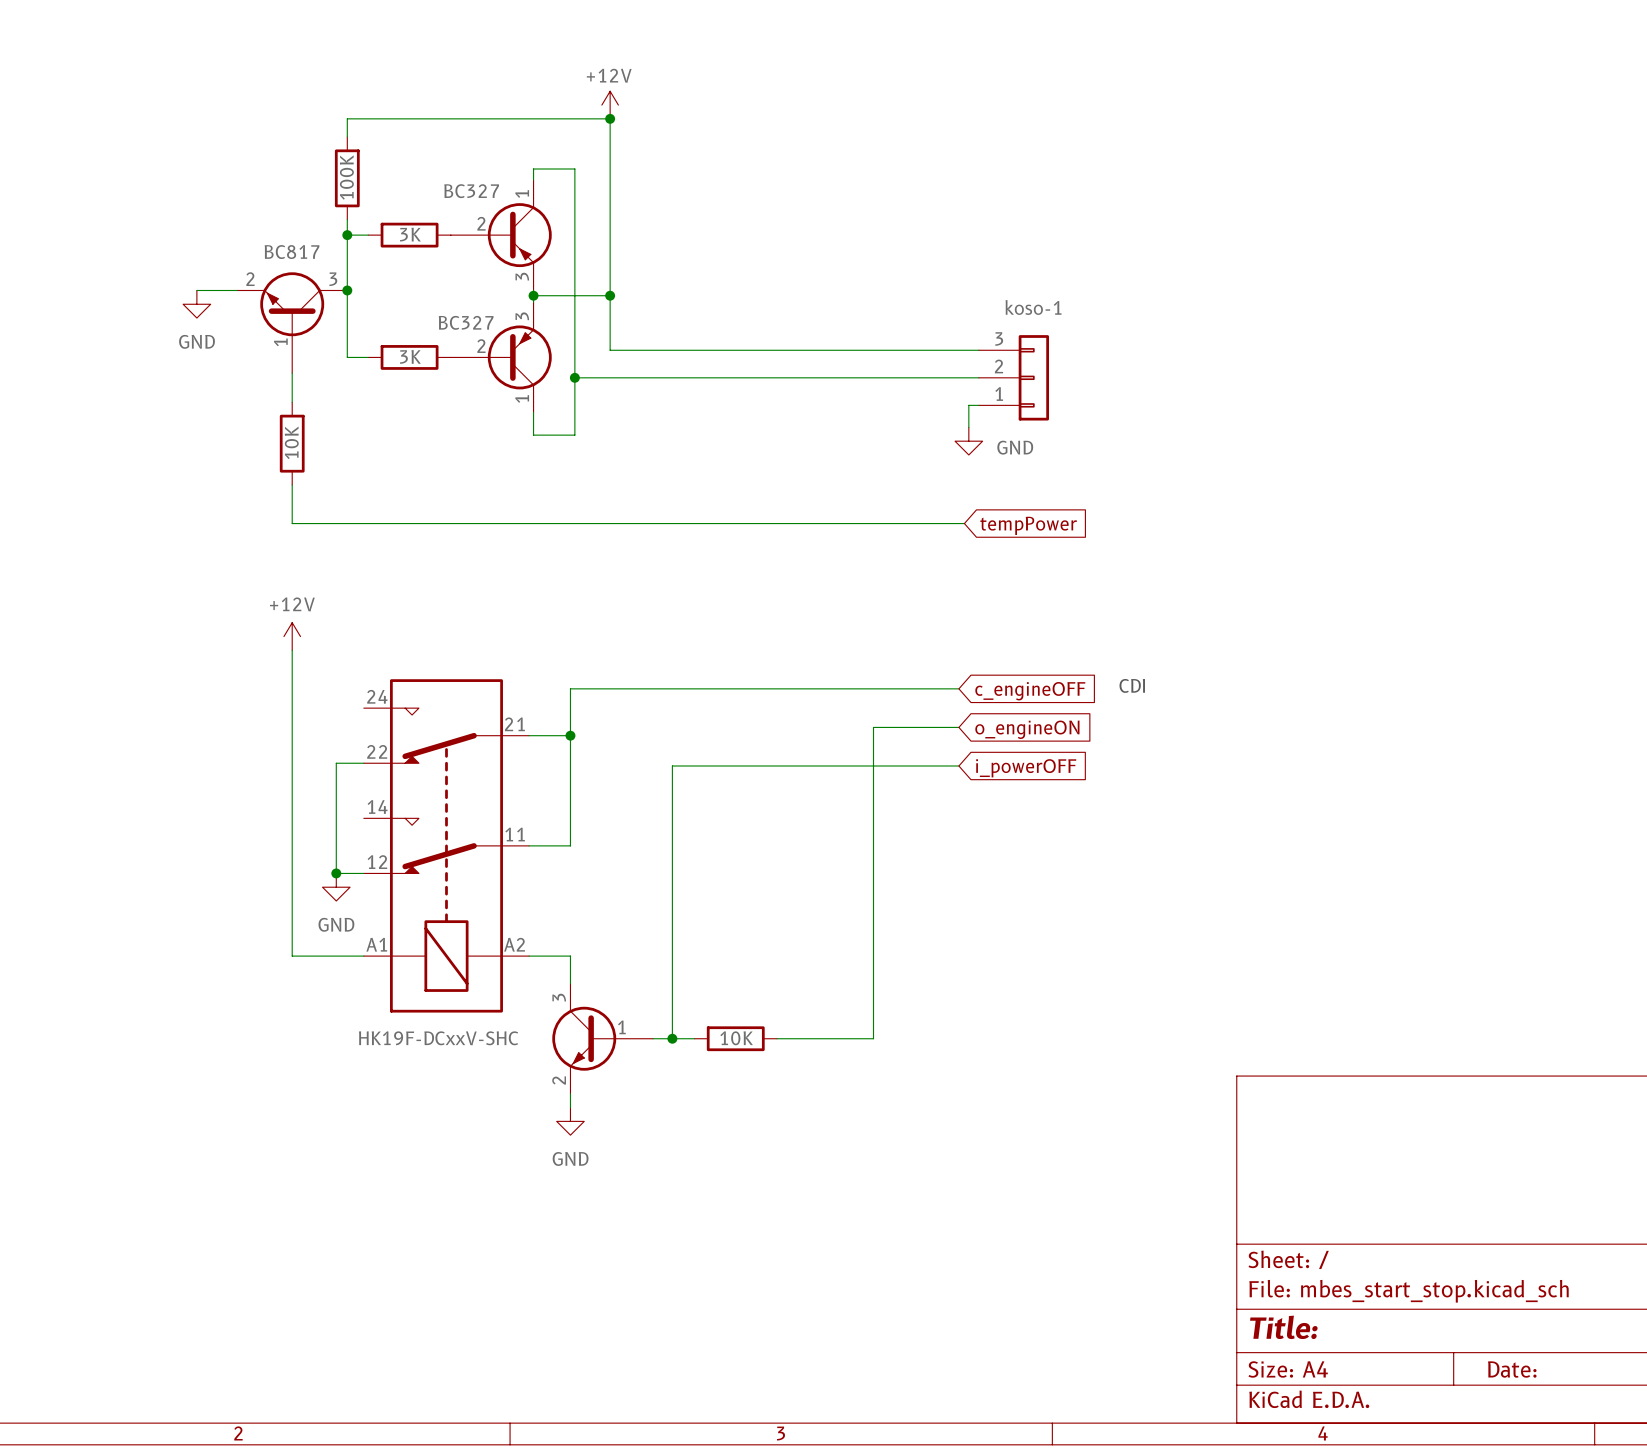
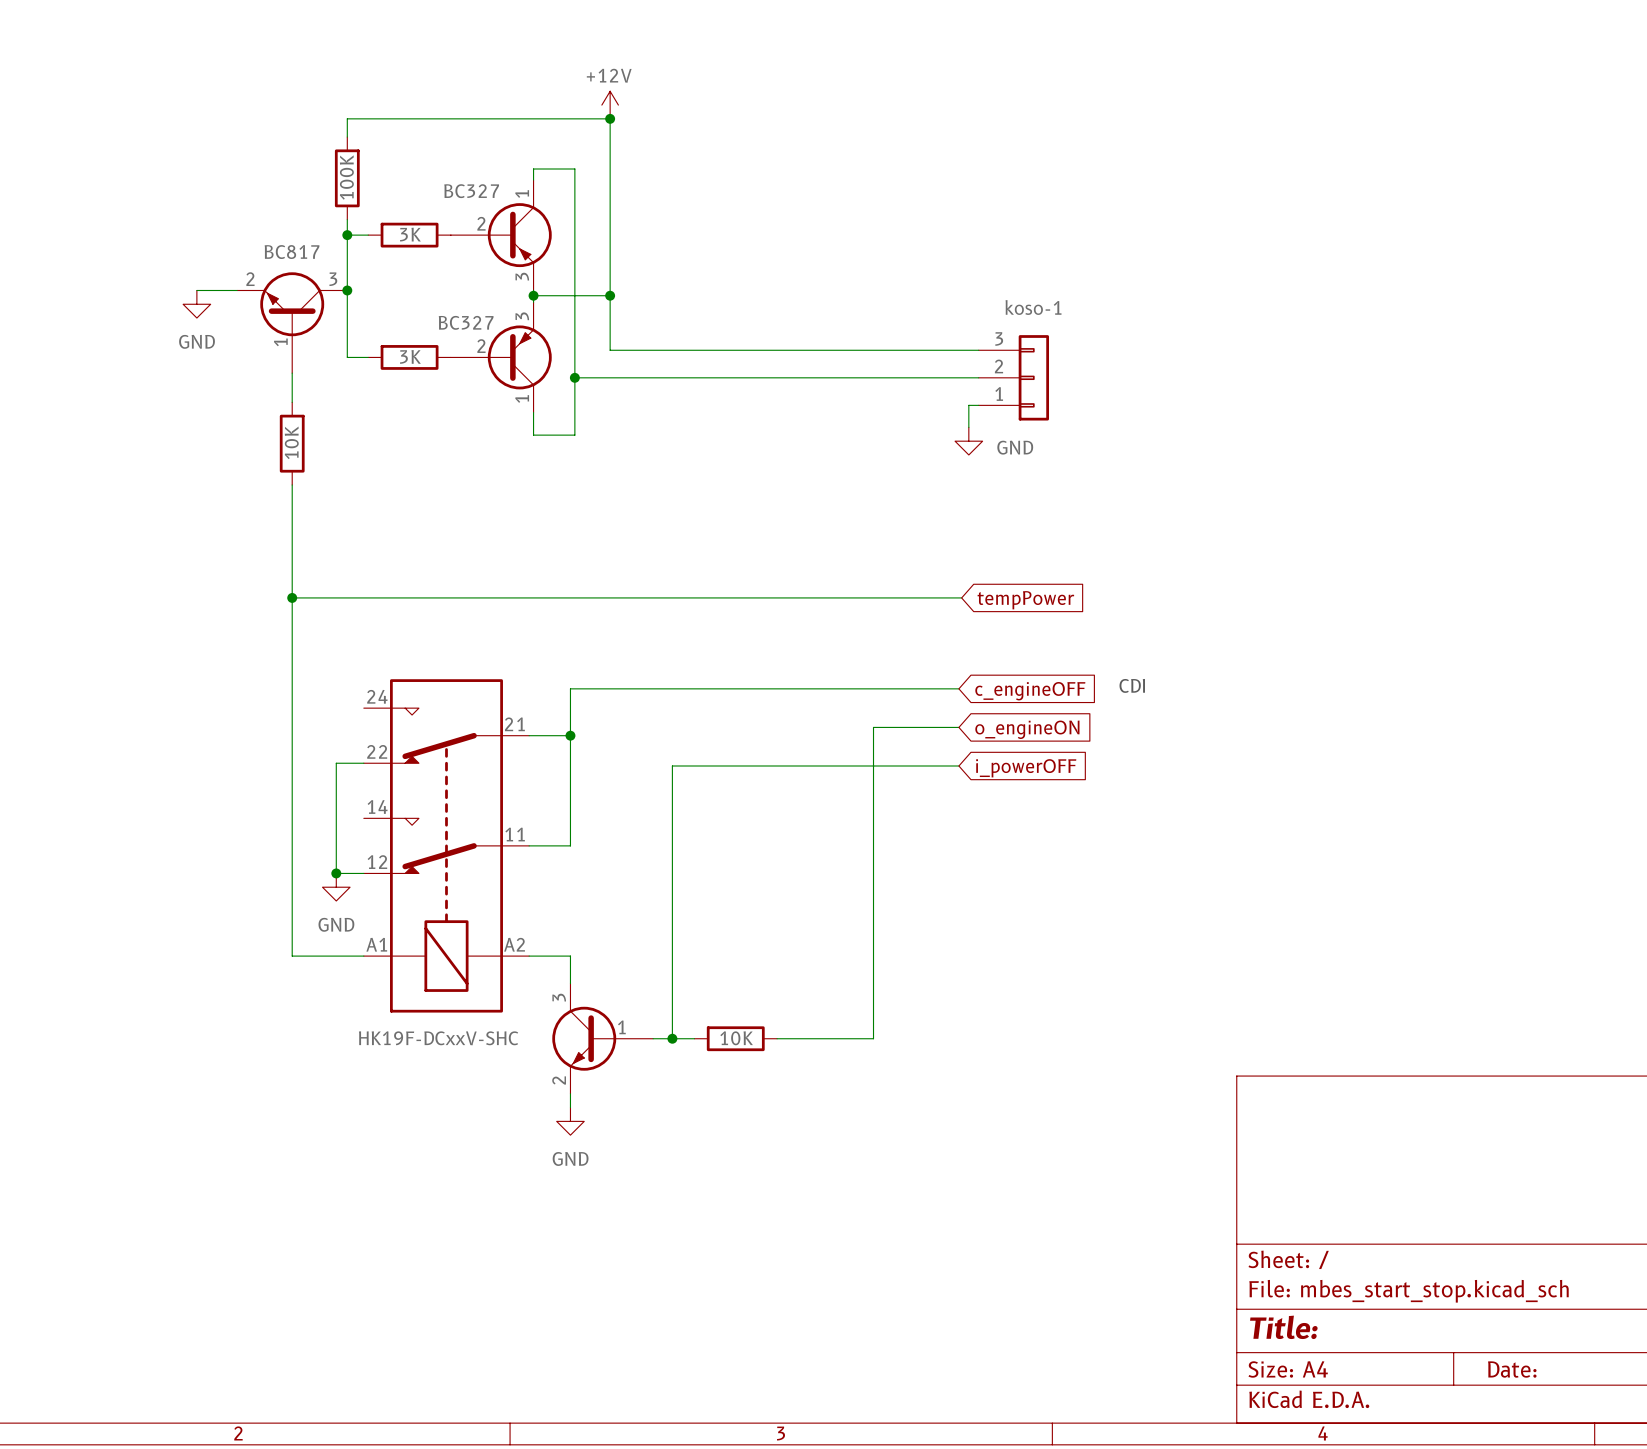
wire: (292, 523) (964, 523) -> (292, 523) (292, 650)
global label position: tempPower (1028, 525) -> tempPower (1025, 600)
wire: none -> (292, 597) (961, 597)
junction: none -> (292, 597)
power symbol: +12V (292, 636) -> none

